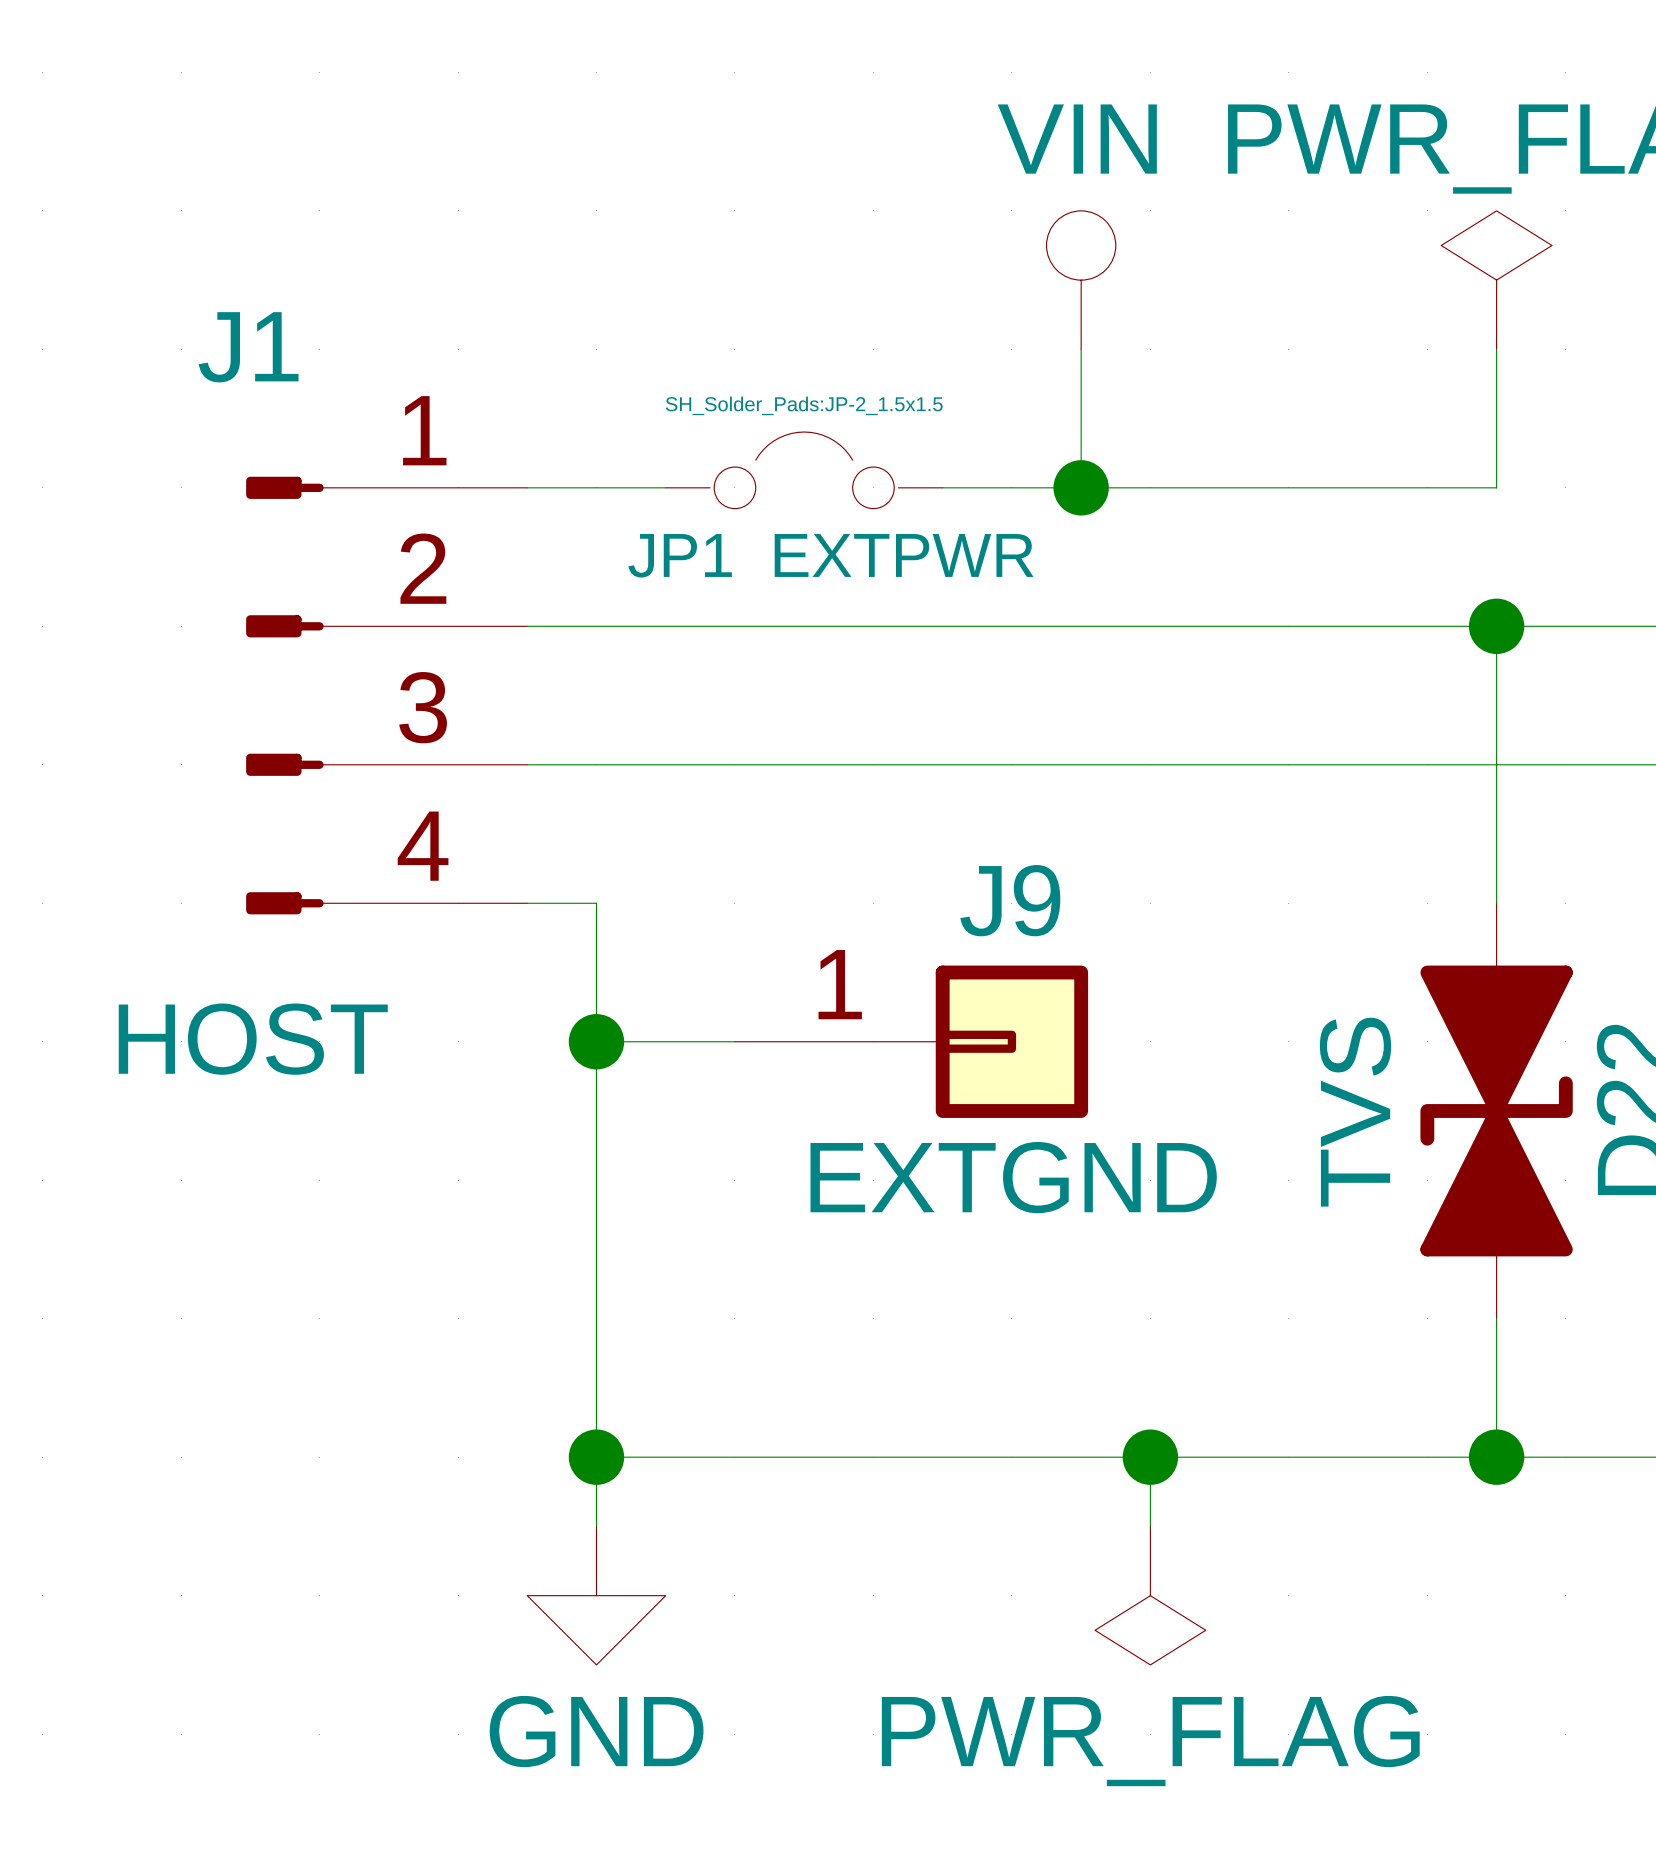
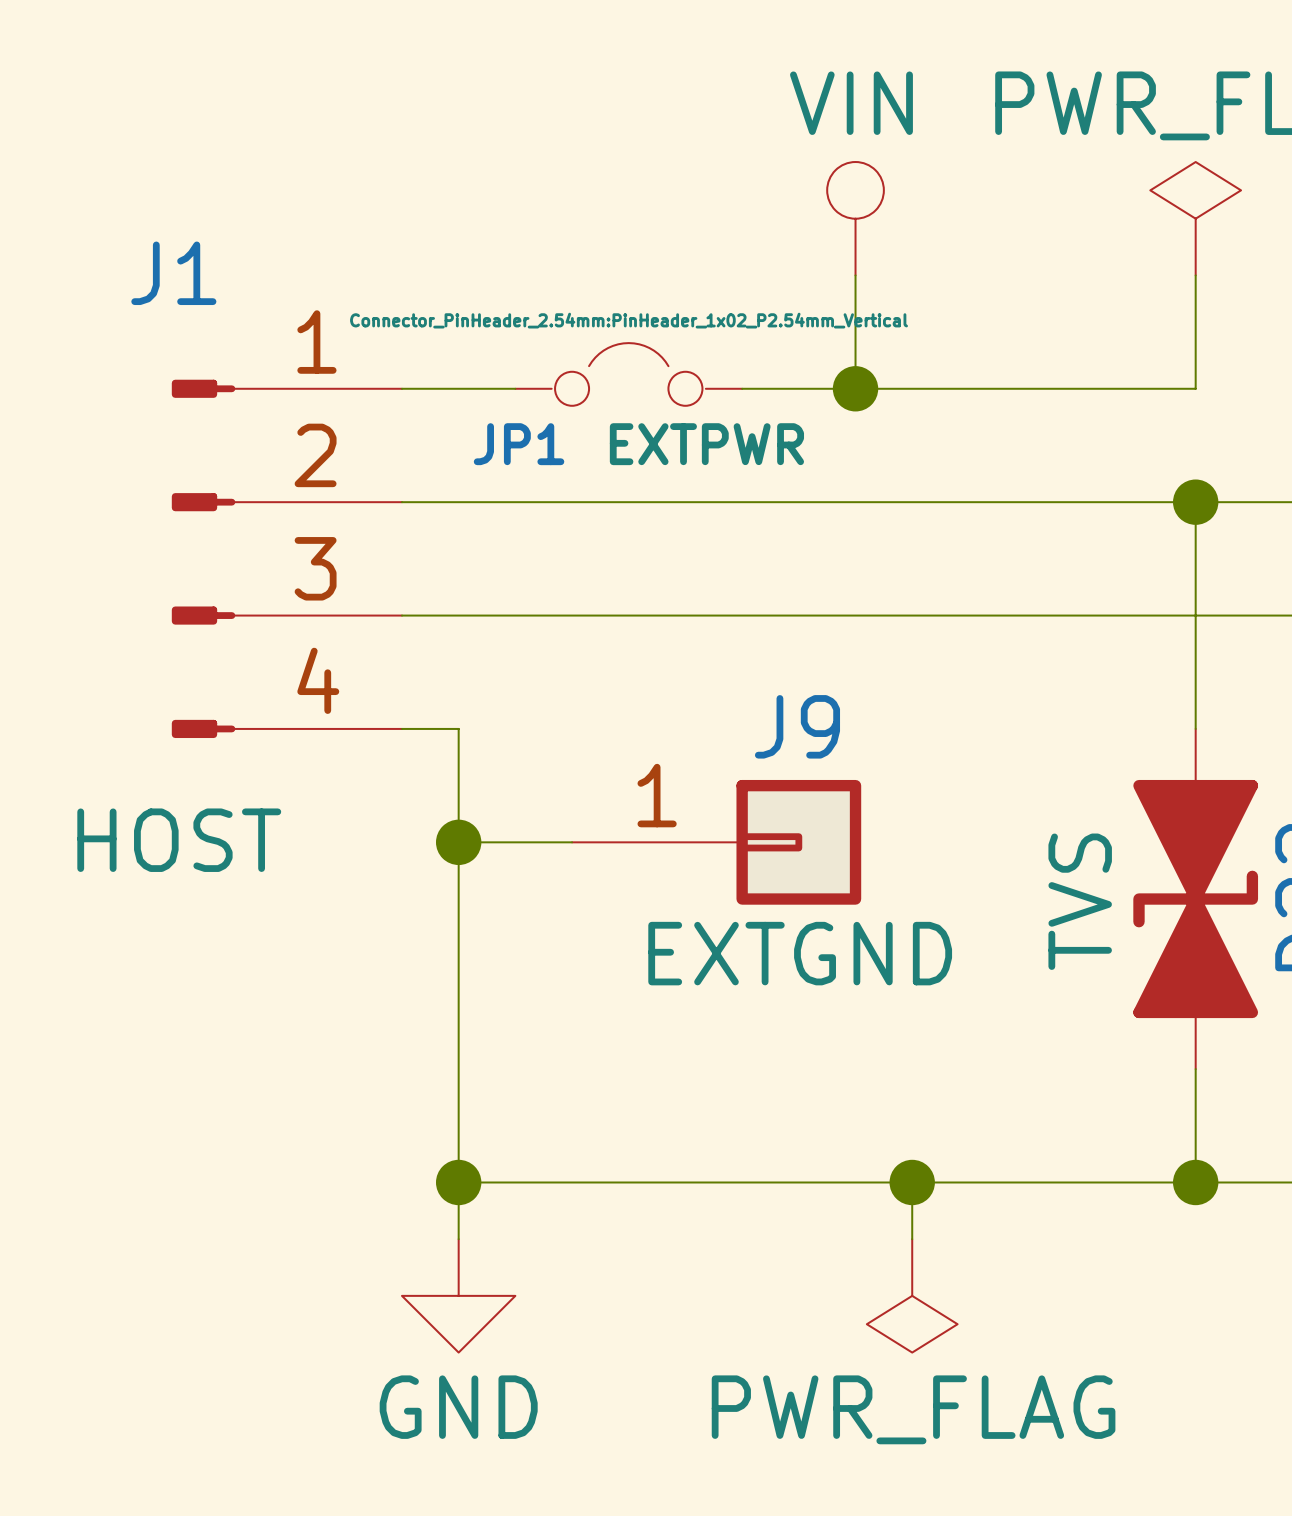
JP1 text: SH_Solder_Pads:JP-2_1.5x1.5 (804, 405) -> Connector_PinHeader_2.54mm:PinHeader_1x02_P2.54mm_Vertical (629, 320)

